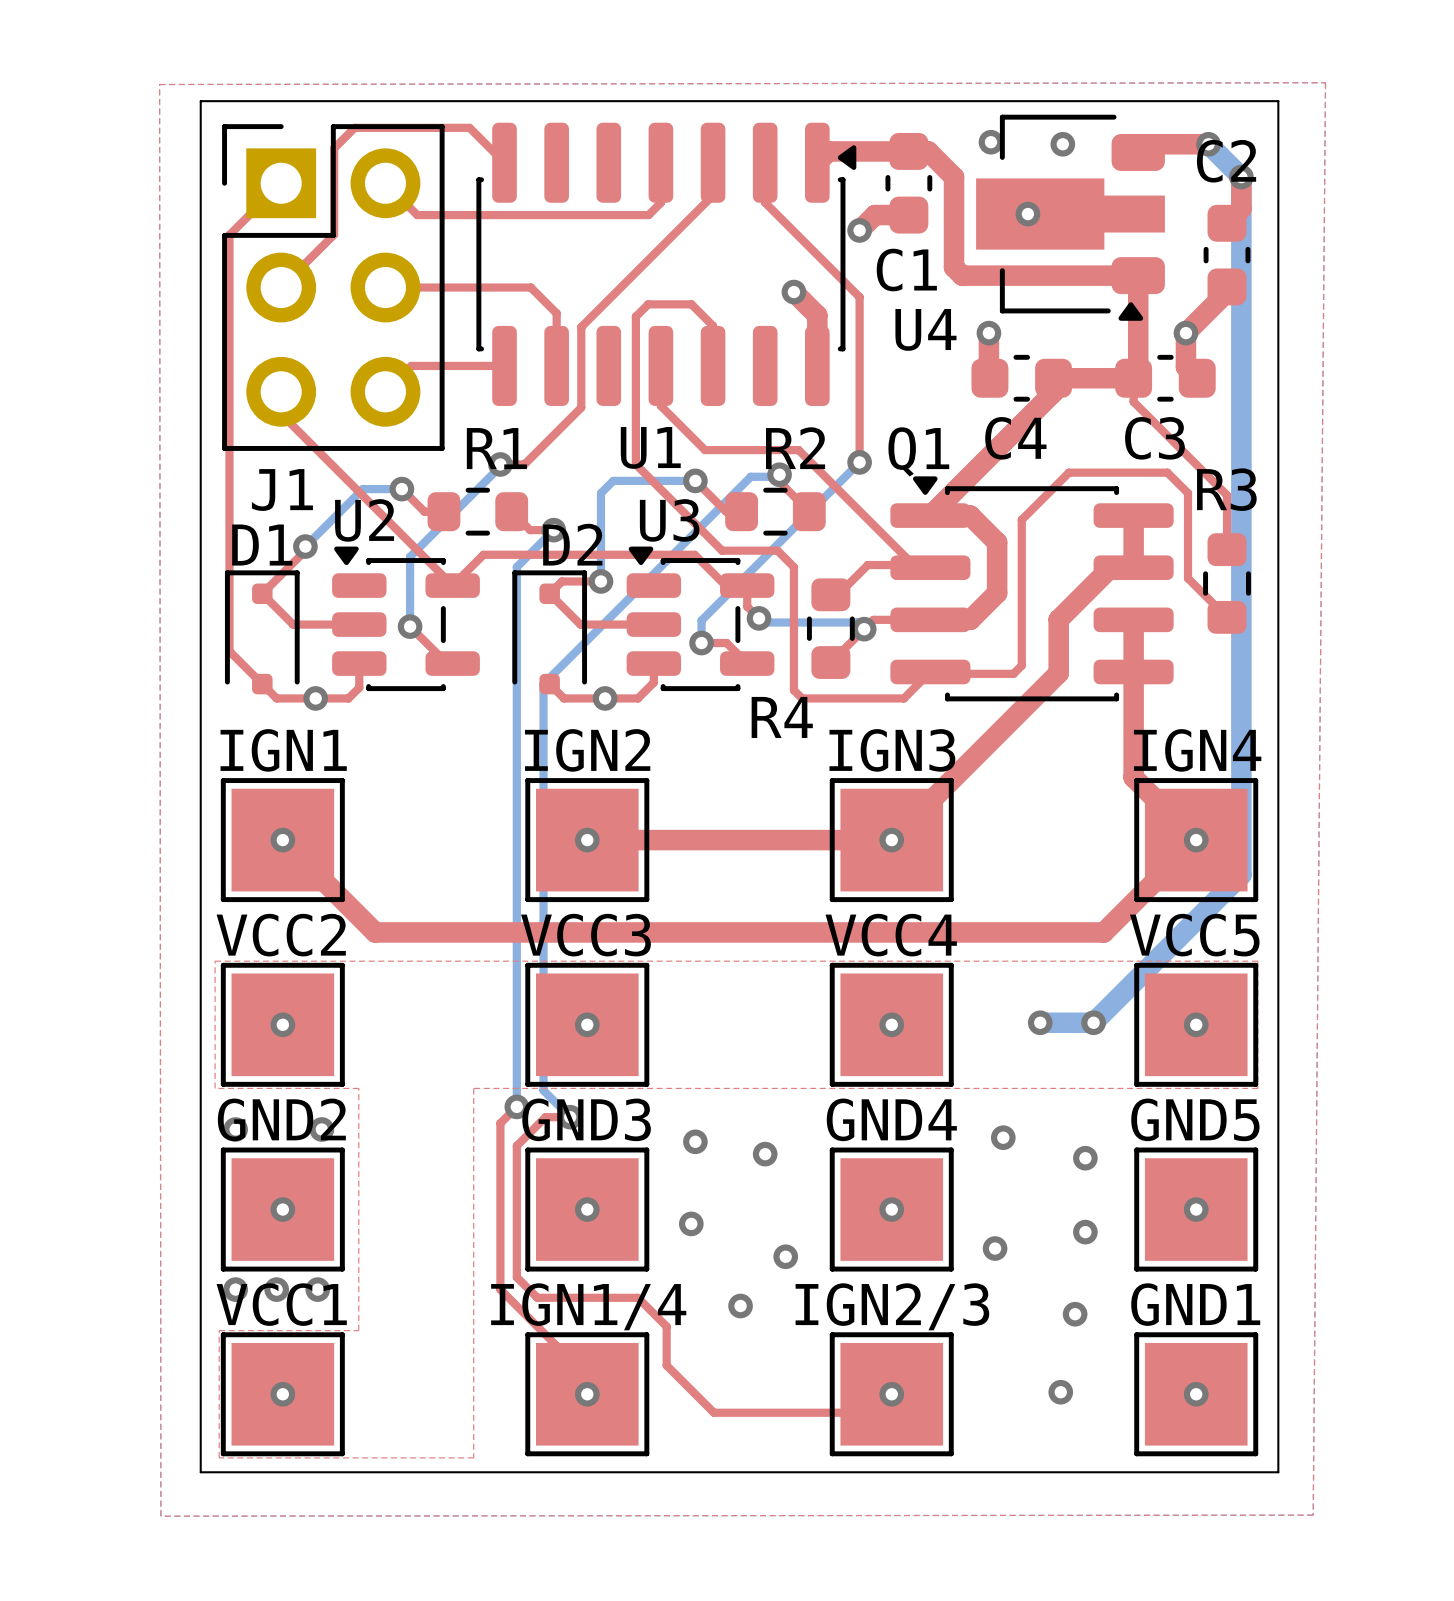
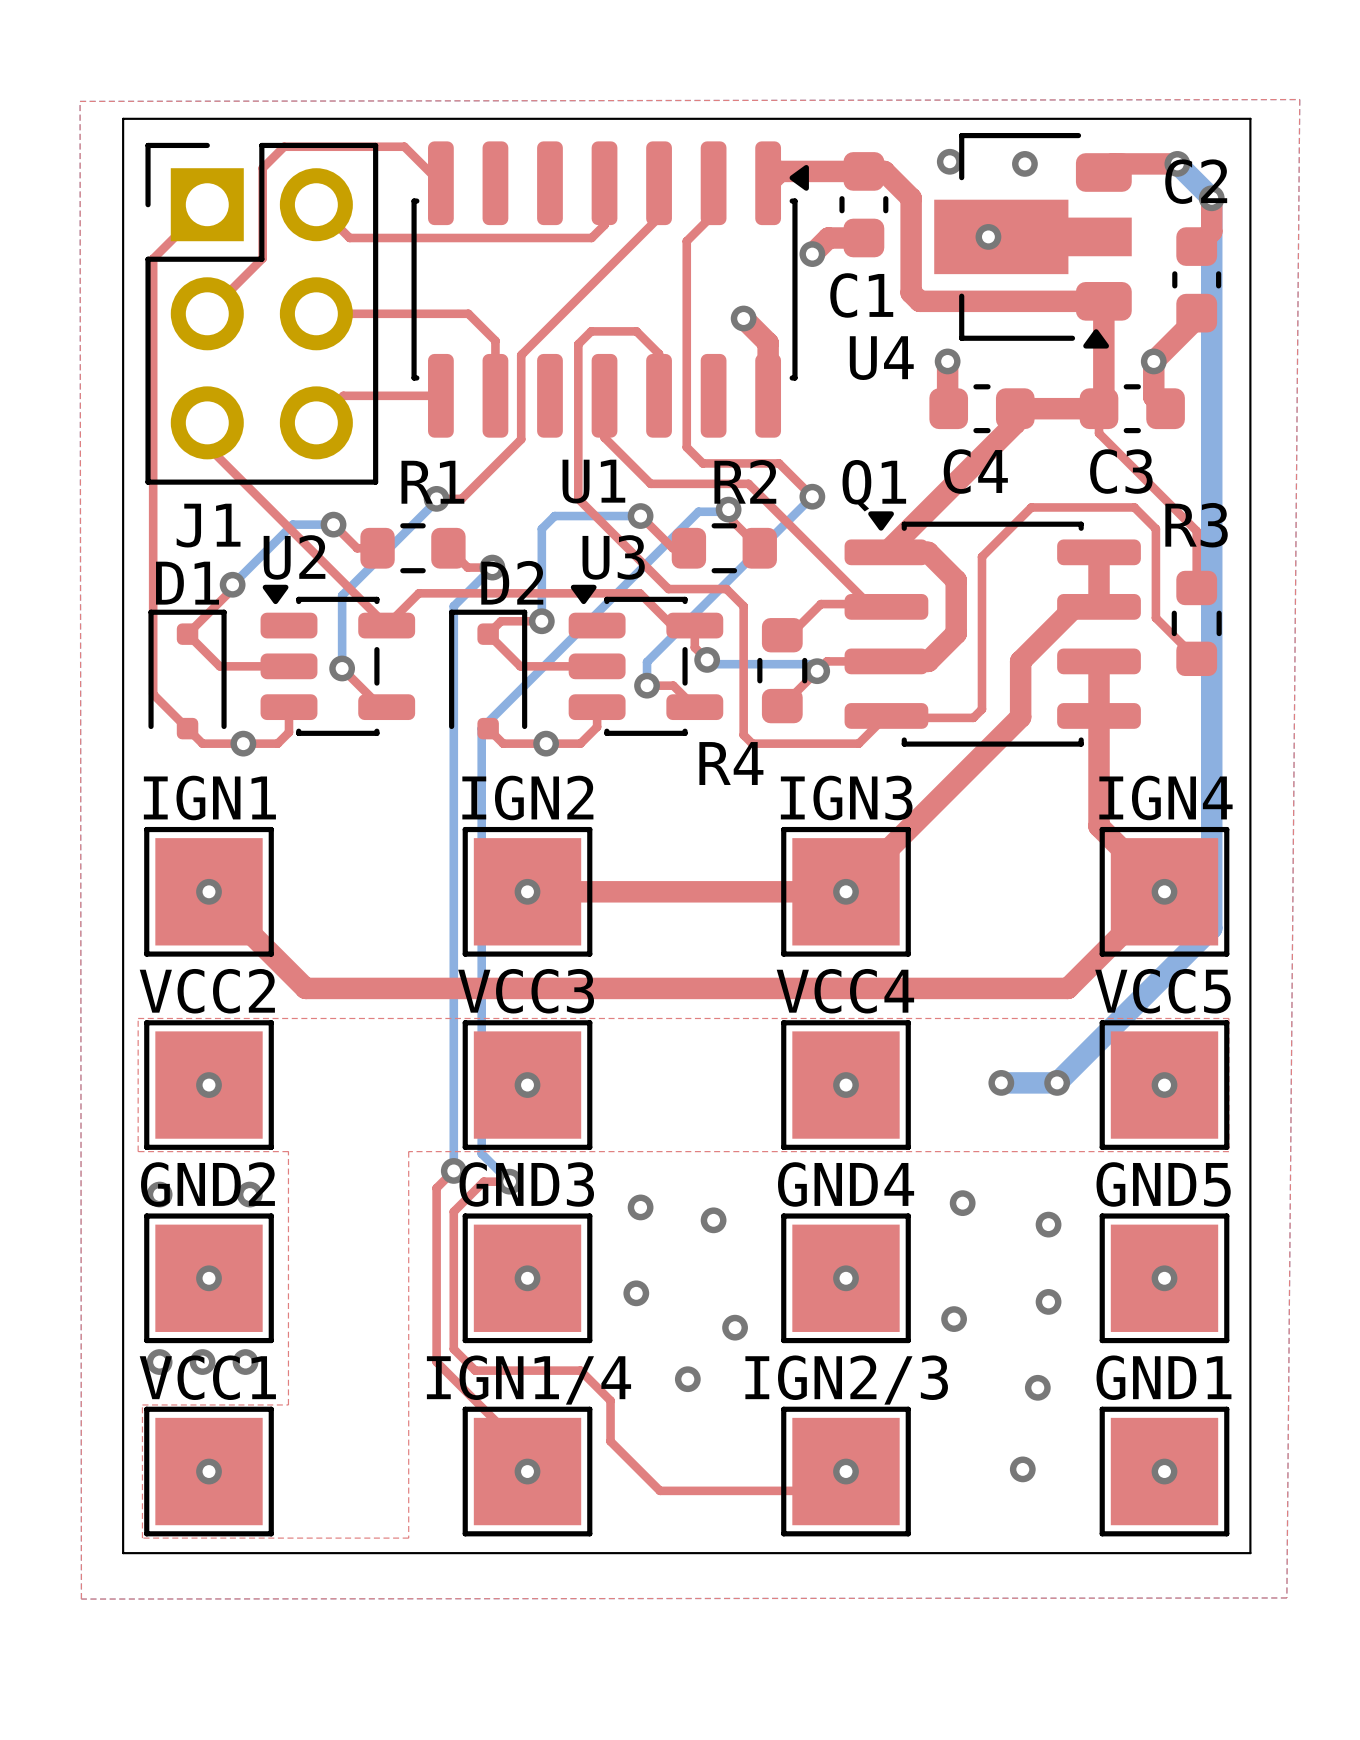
top track: (765, 192) (765, 202) (859, 297) (859, 462) -> (713, 214) (686, 241) (686, 447) (702, 463) (779, 463) (812, 496)

